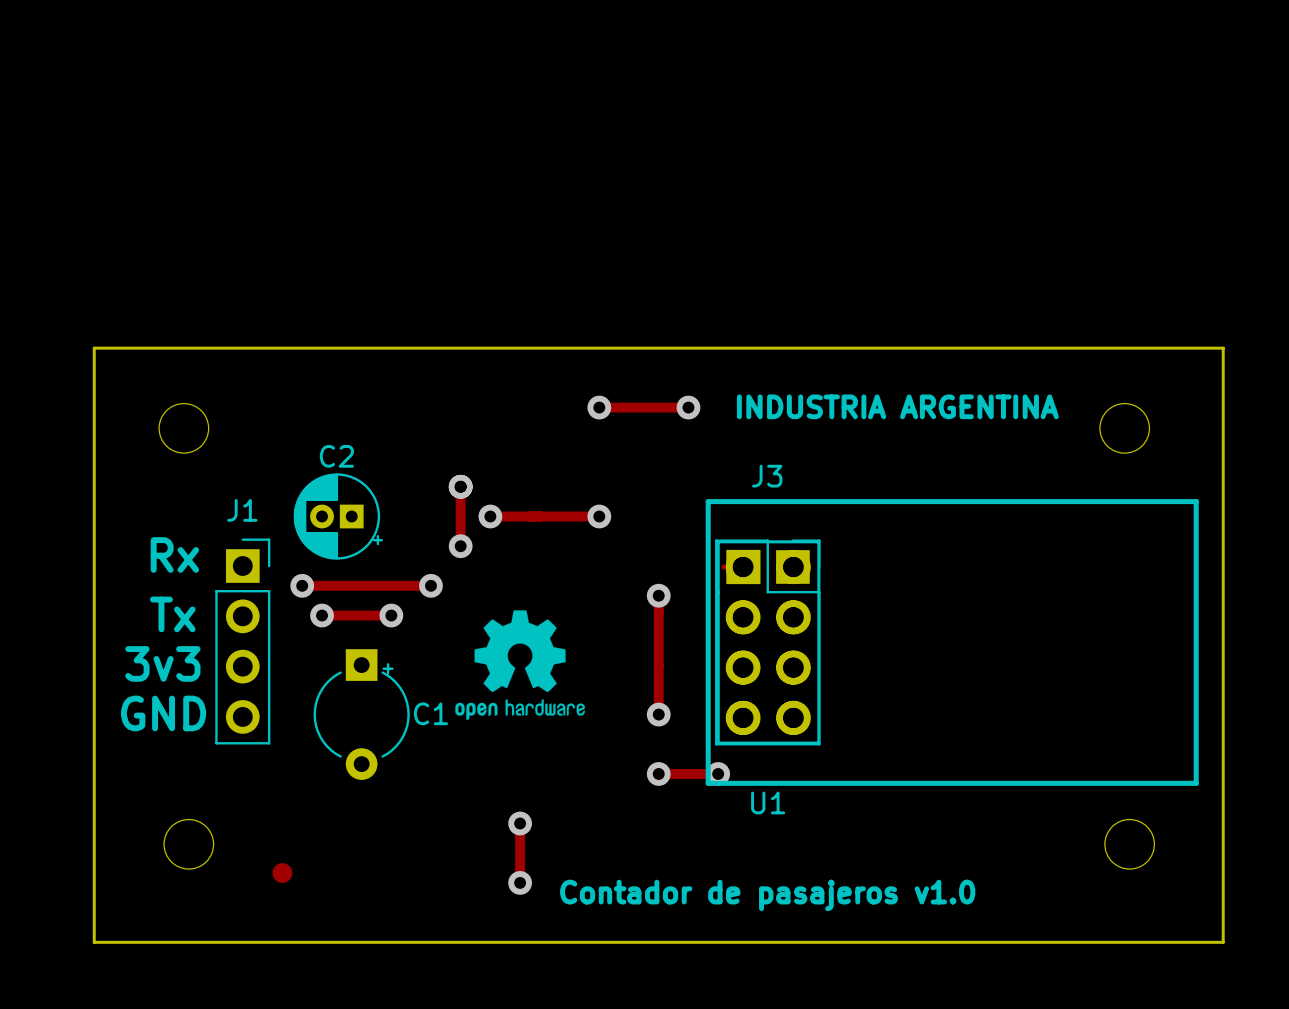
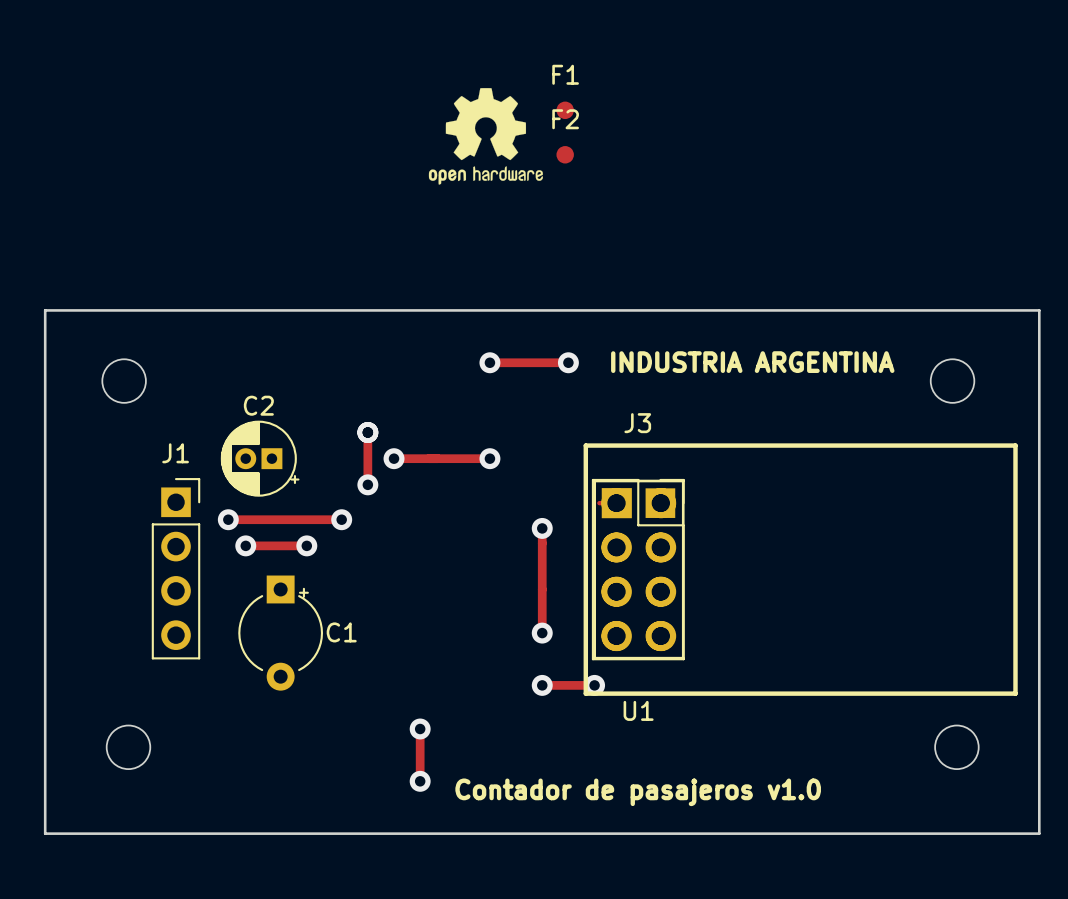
drawing: none -> [428, 88, 543, 185]
F1: none -> (565, 110)
F2: none -> (565, 154)
text: Rx (174, 555) -> none
drawing: [455, 610, 585, 721] -> none
text: Tx (172, 614) -> none
text: 3v3 (162, 663) -> none
text: GND (163, 713) -> none
part: (282, 873) -> none

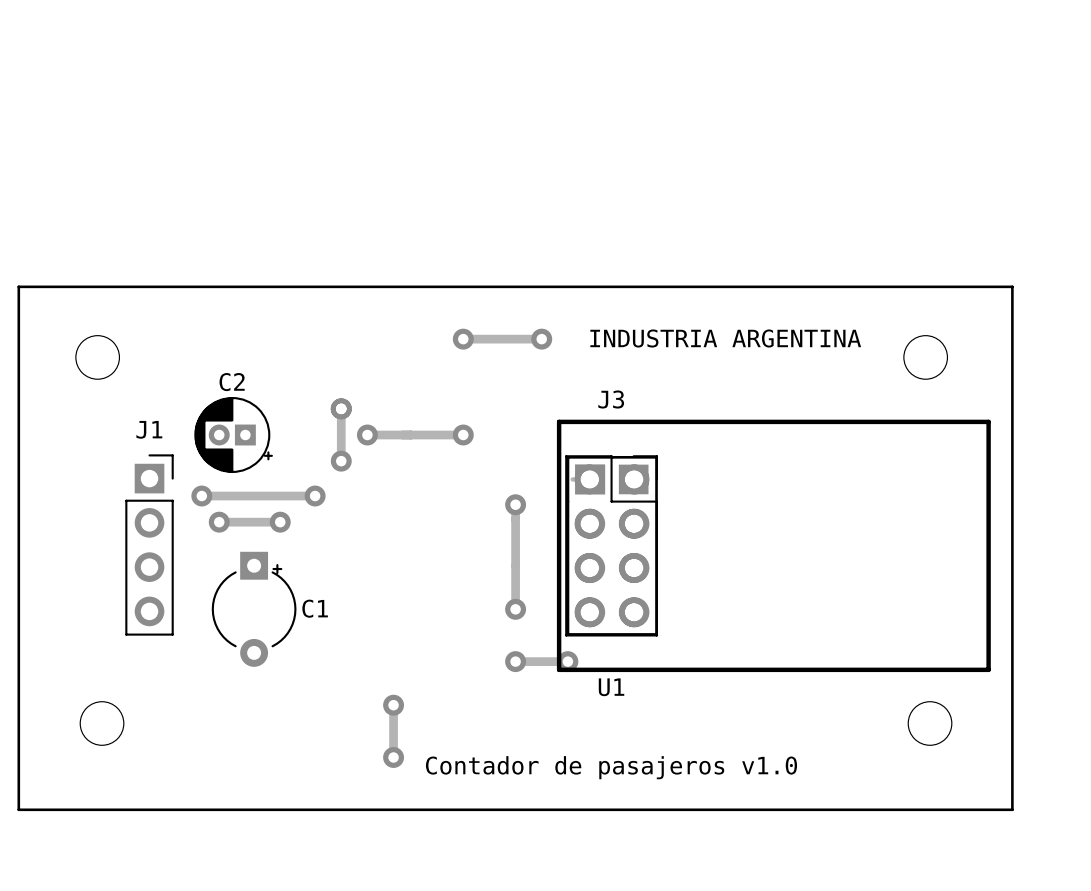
drawing: [428, 88, 543, 185] -> none
F1: (565, 110) -> none
F2: (565, 154) -> none

